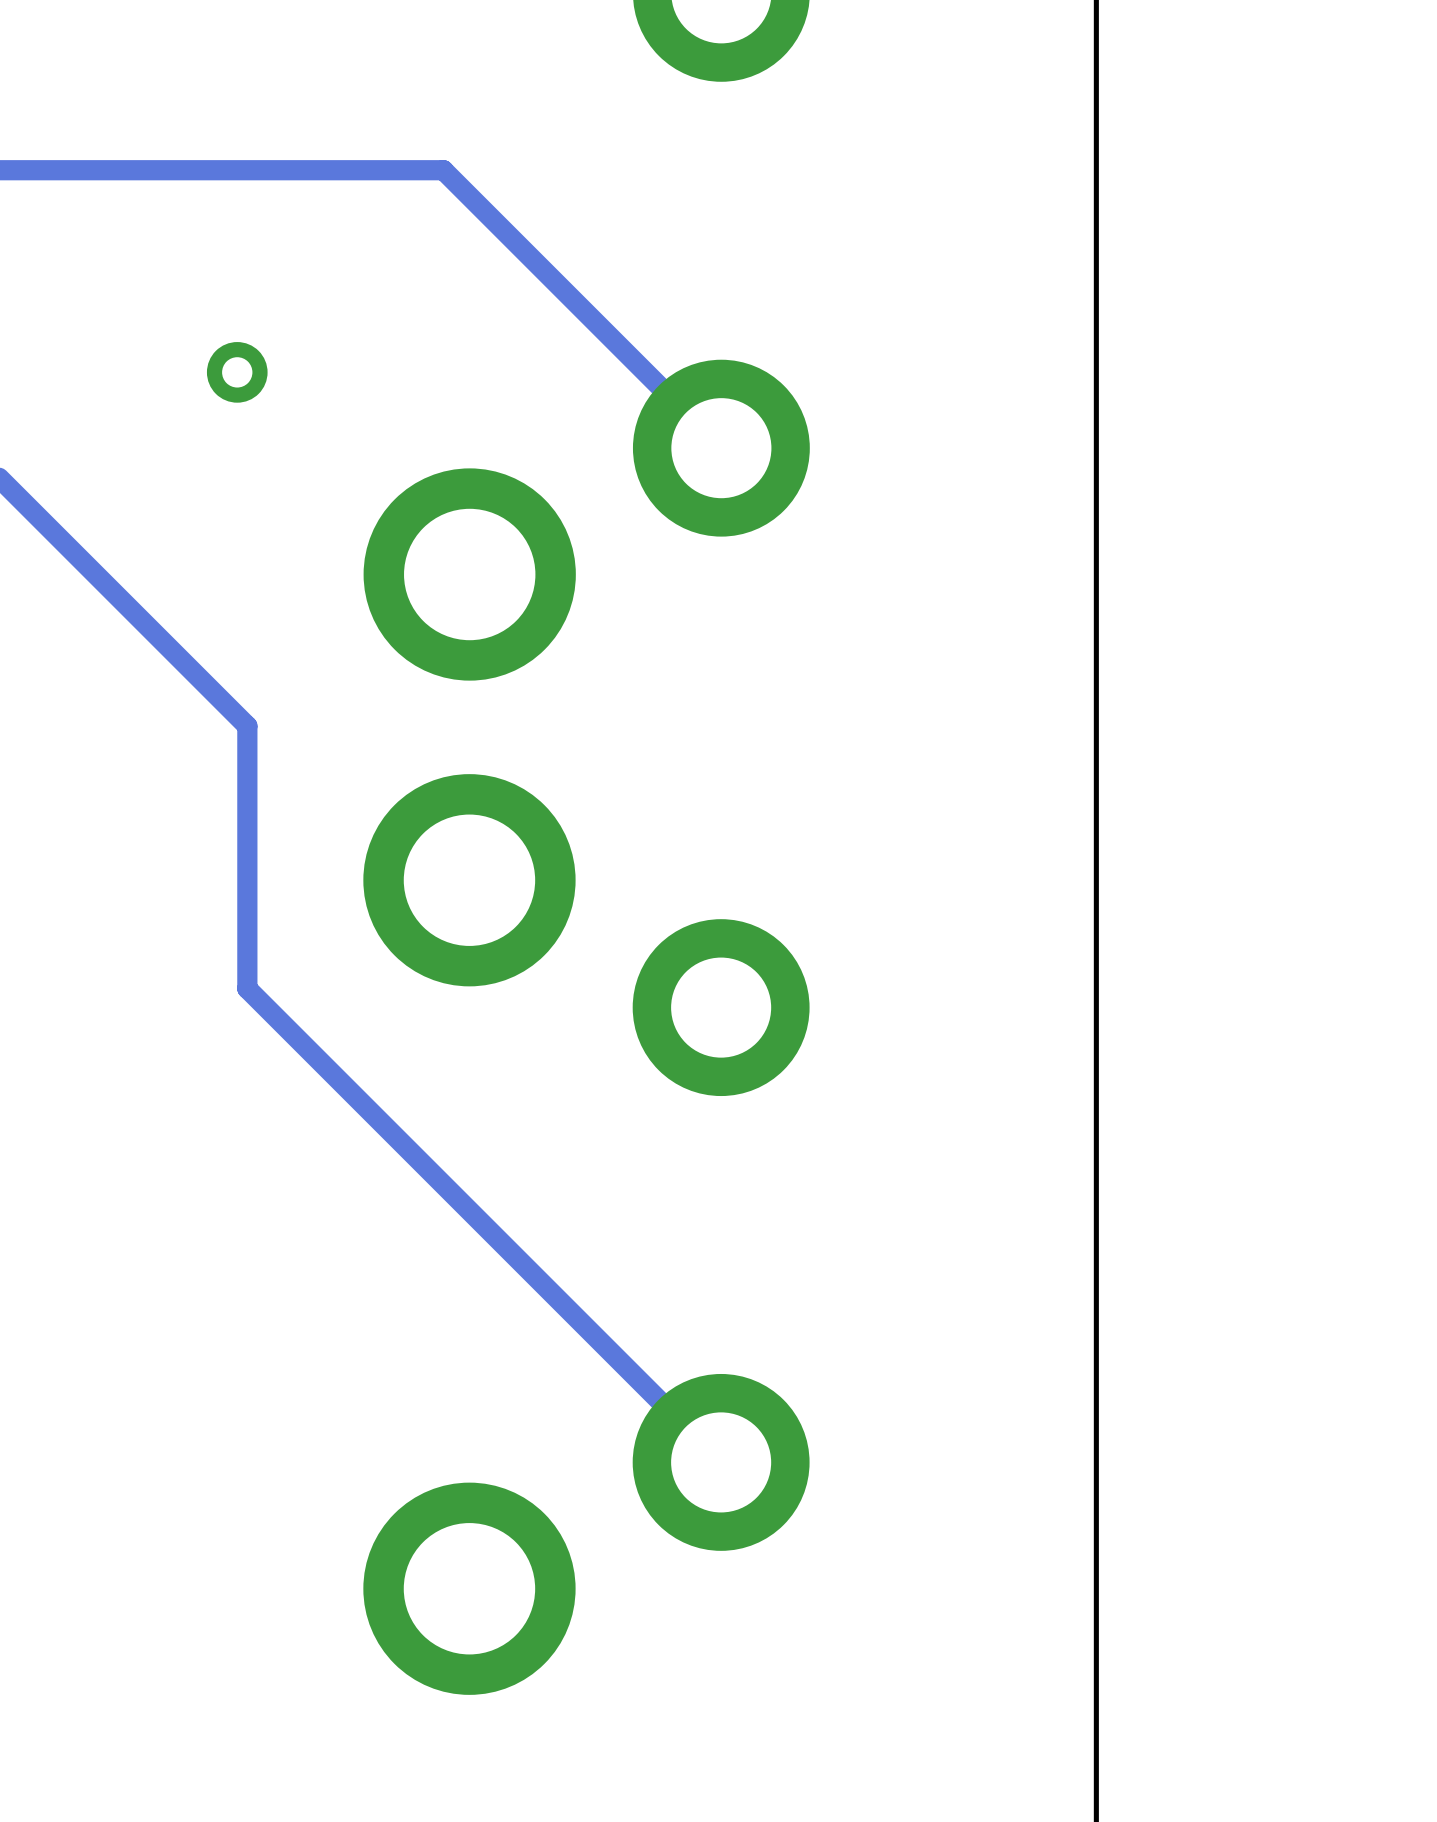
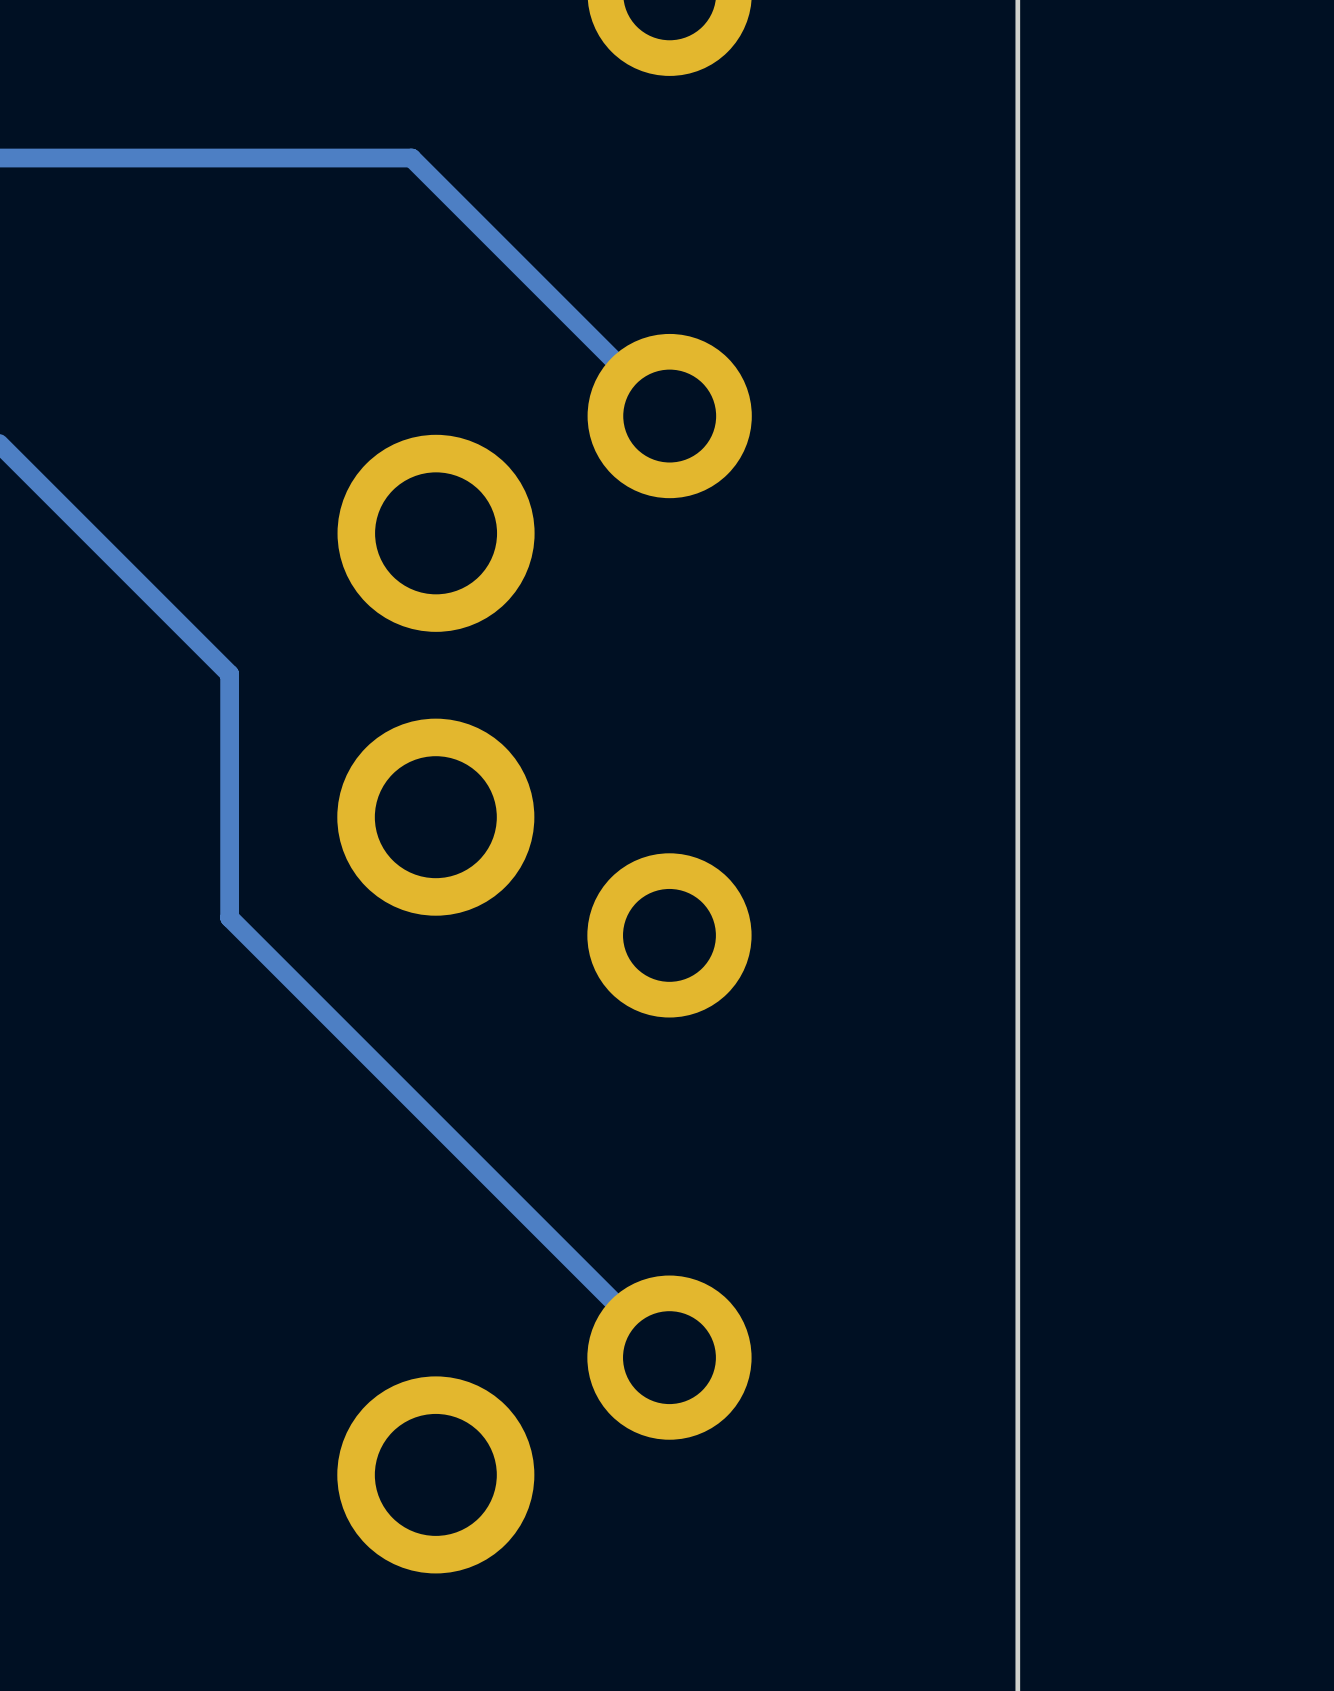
via: (237, 372) -> none

